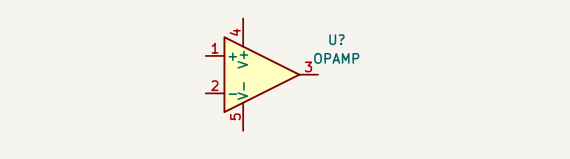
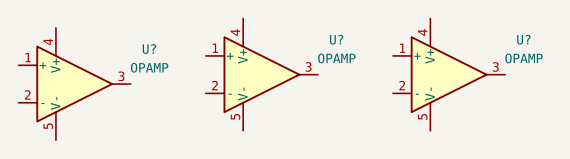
U?: none -> OPAMP (449, 74)
U?: none -> OPAMP (74, 84)

